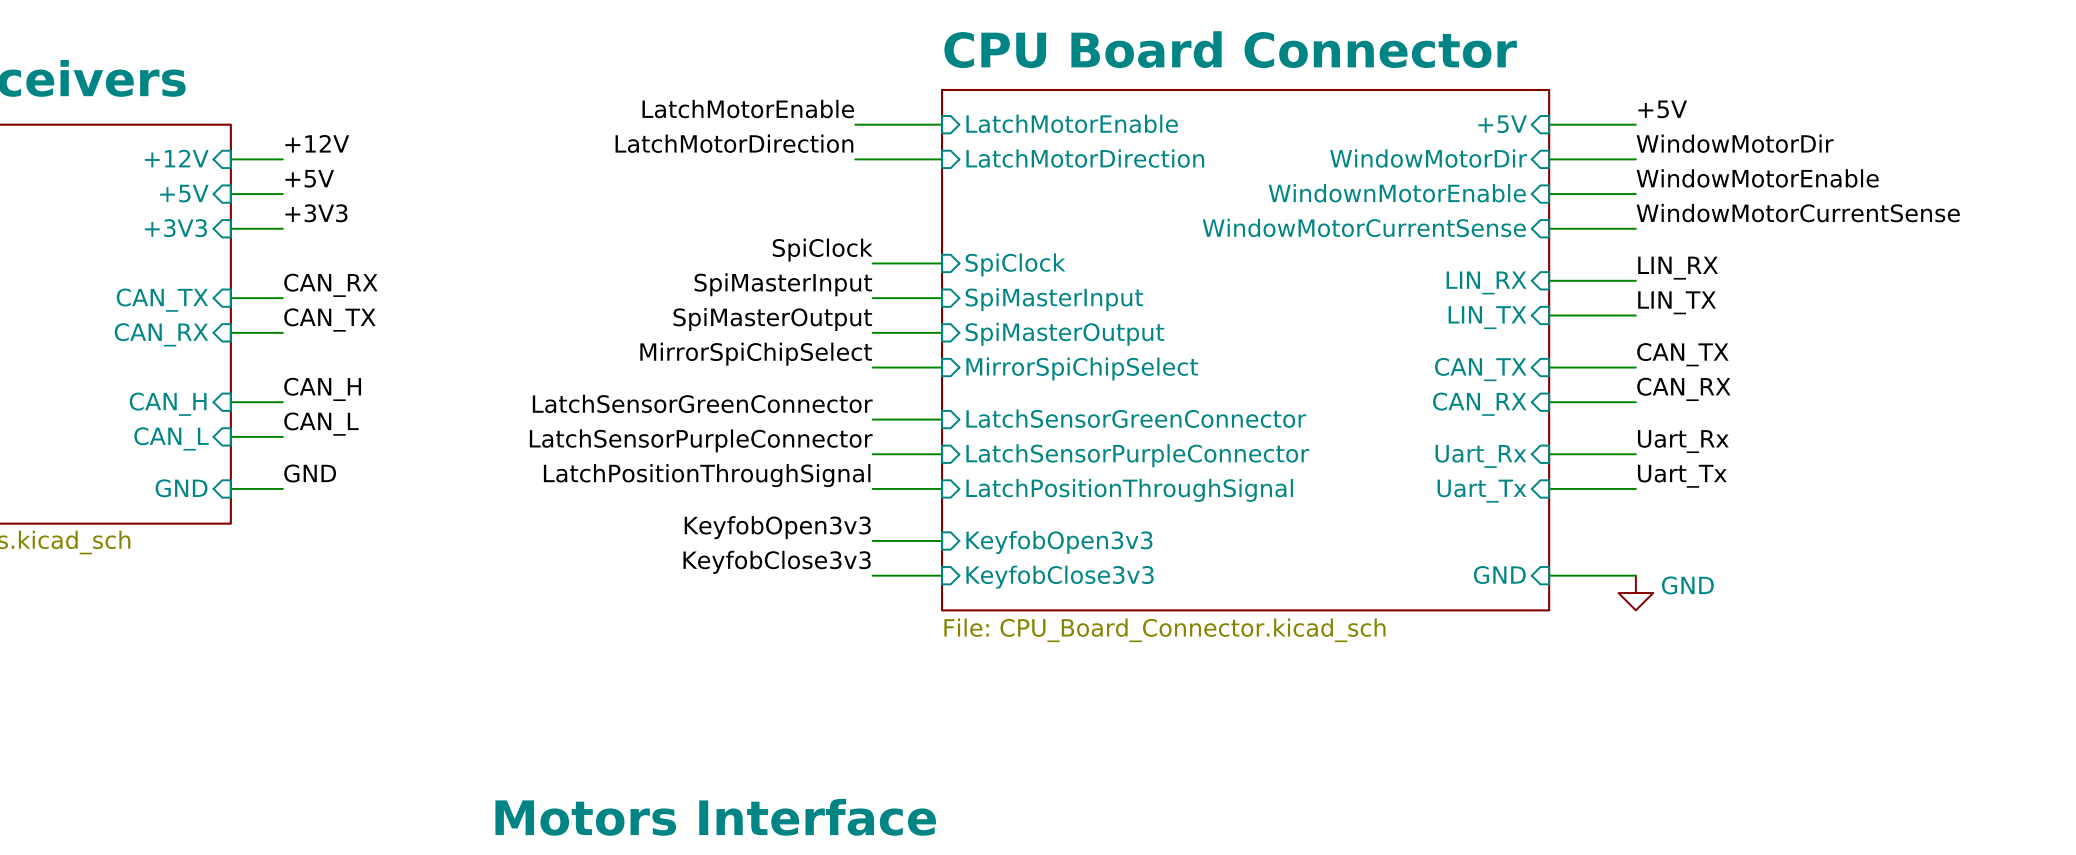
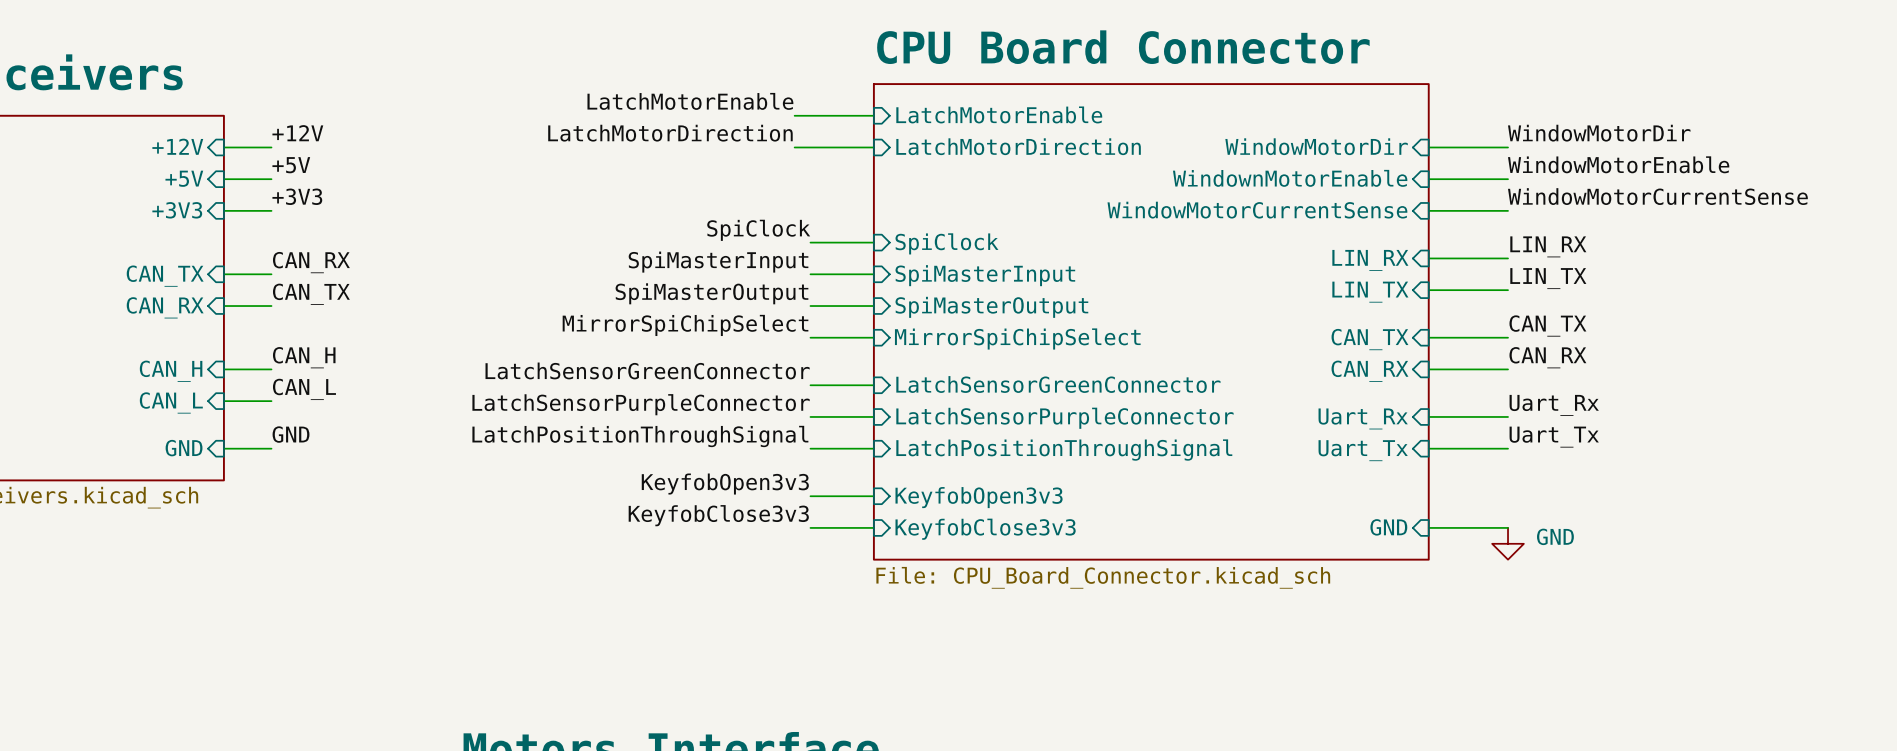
label: +5V (1662, 109) -> none
sheet pin: +5V (1502, 124) -> none
wire: (1549, 124) (1635, 124) -> none

